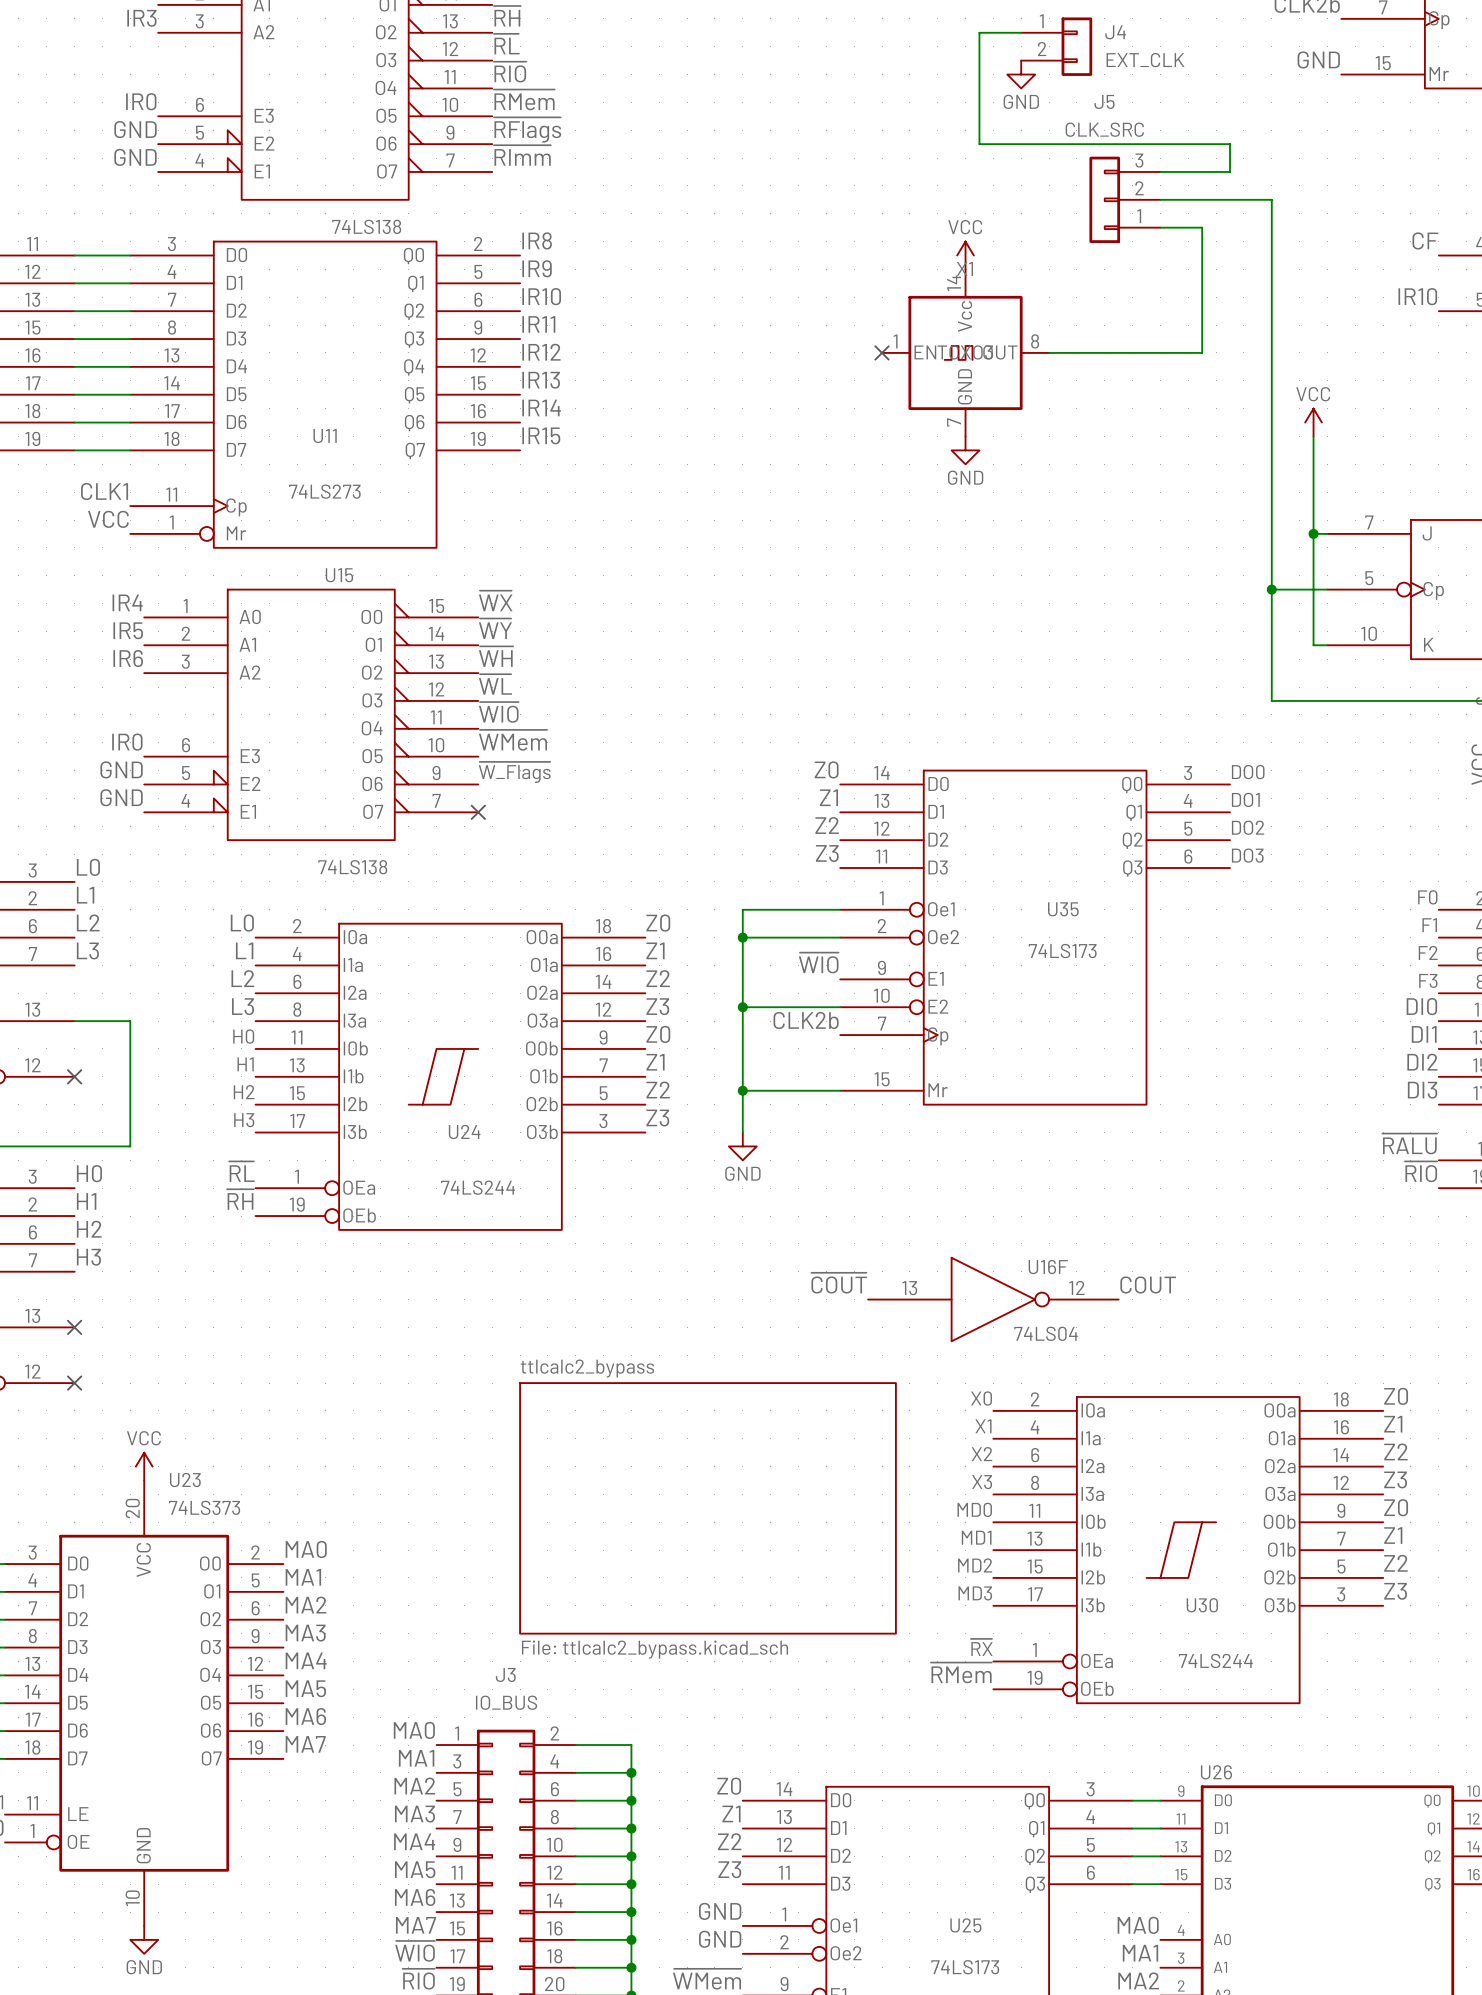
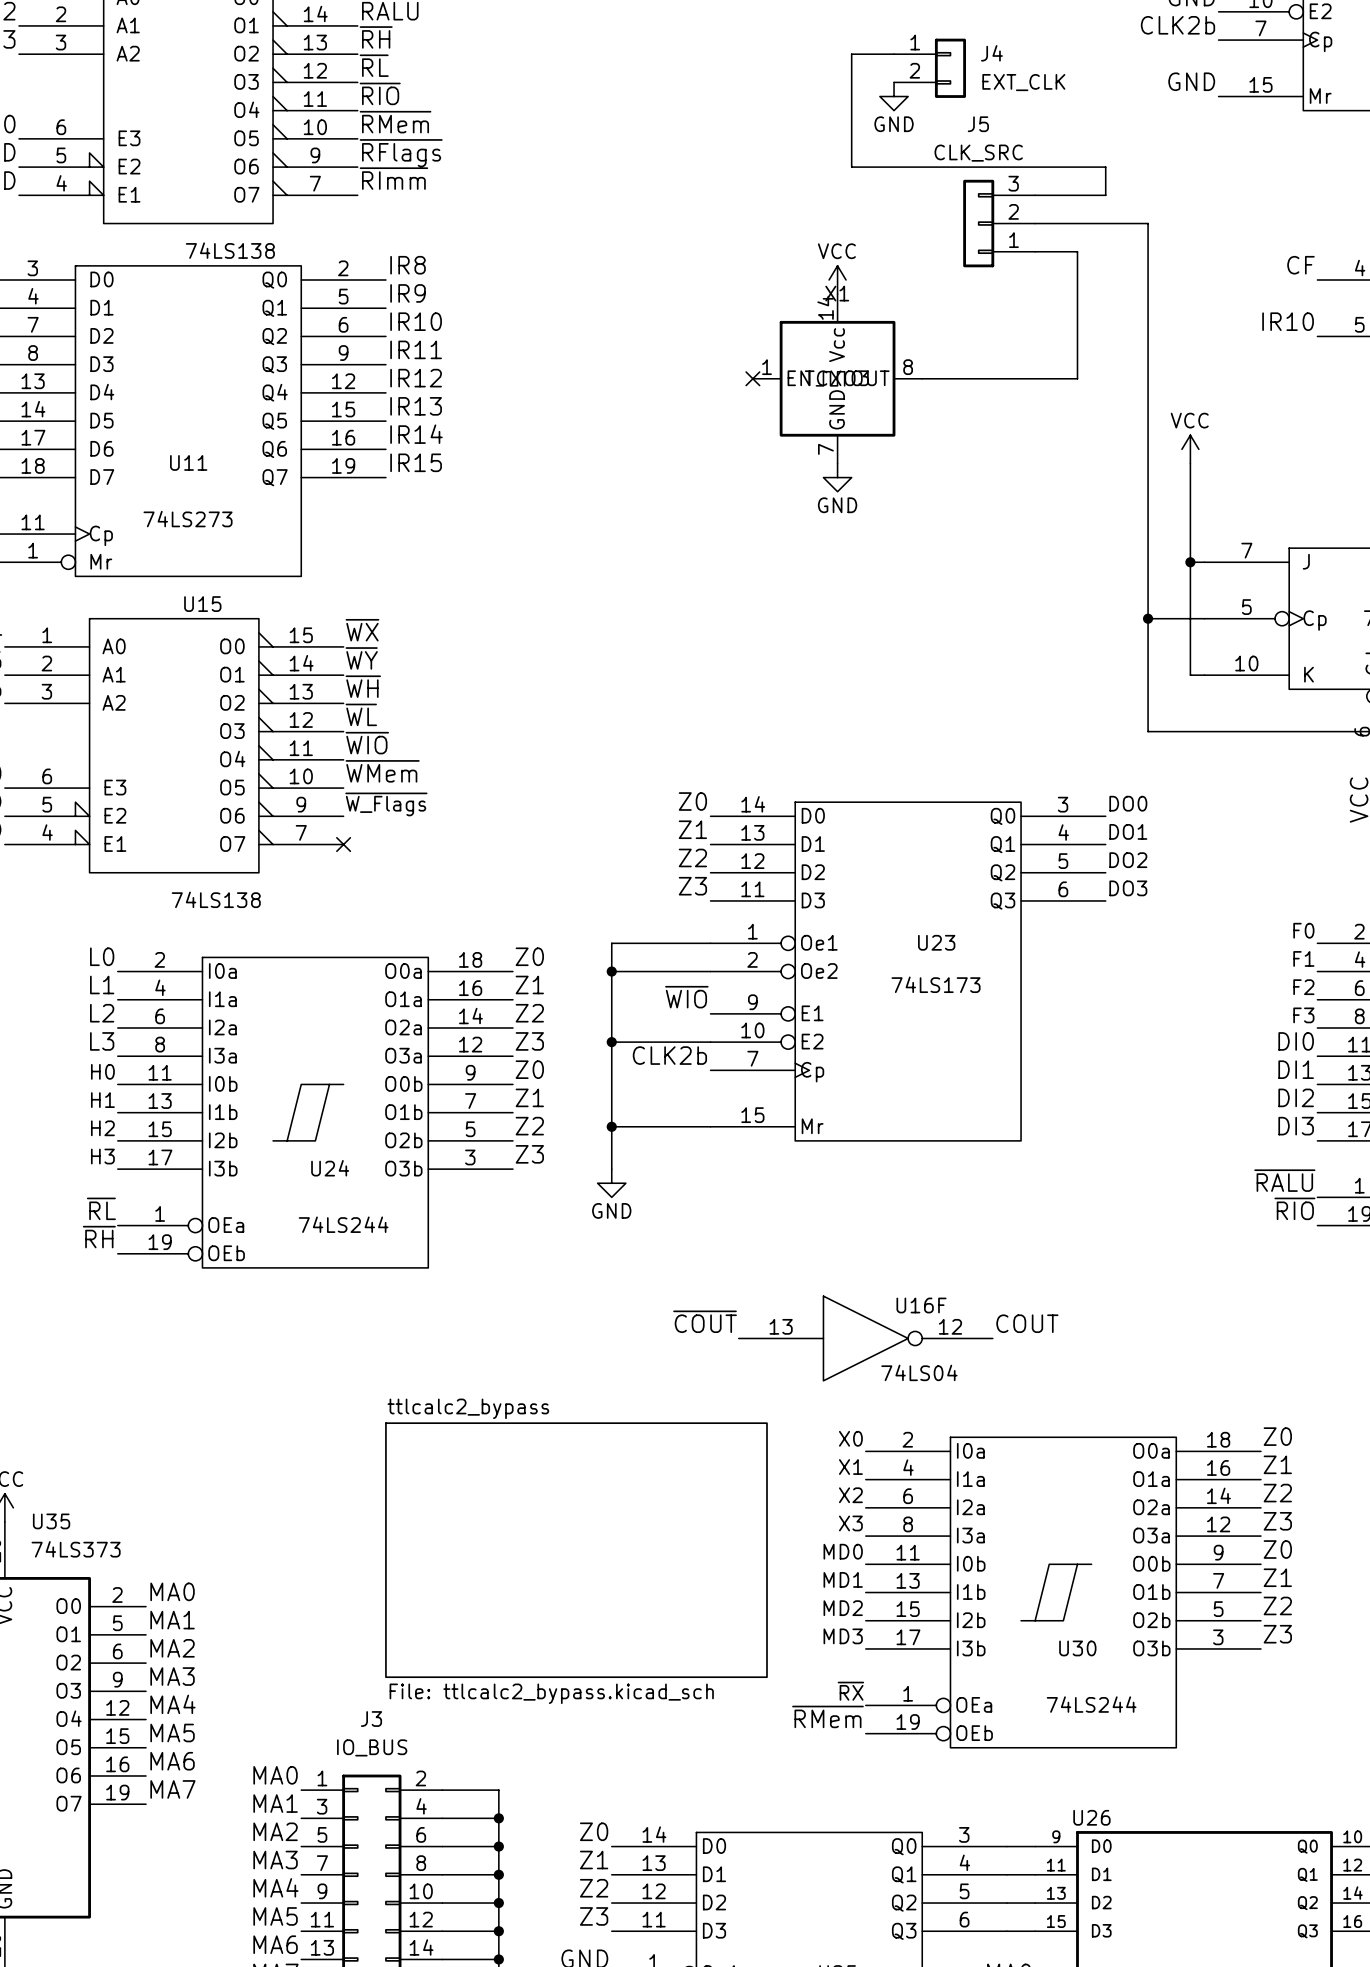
U35 name: U35 (1063, 909) -> U23 (936, 942)
U23 name: U23 (185, 1480) -> U35 (51, 1521)

